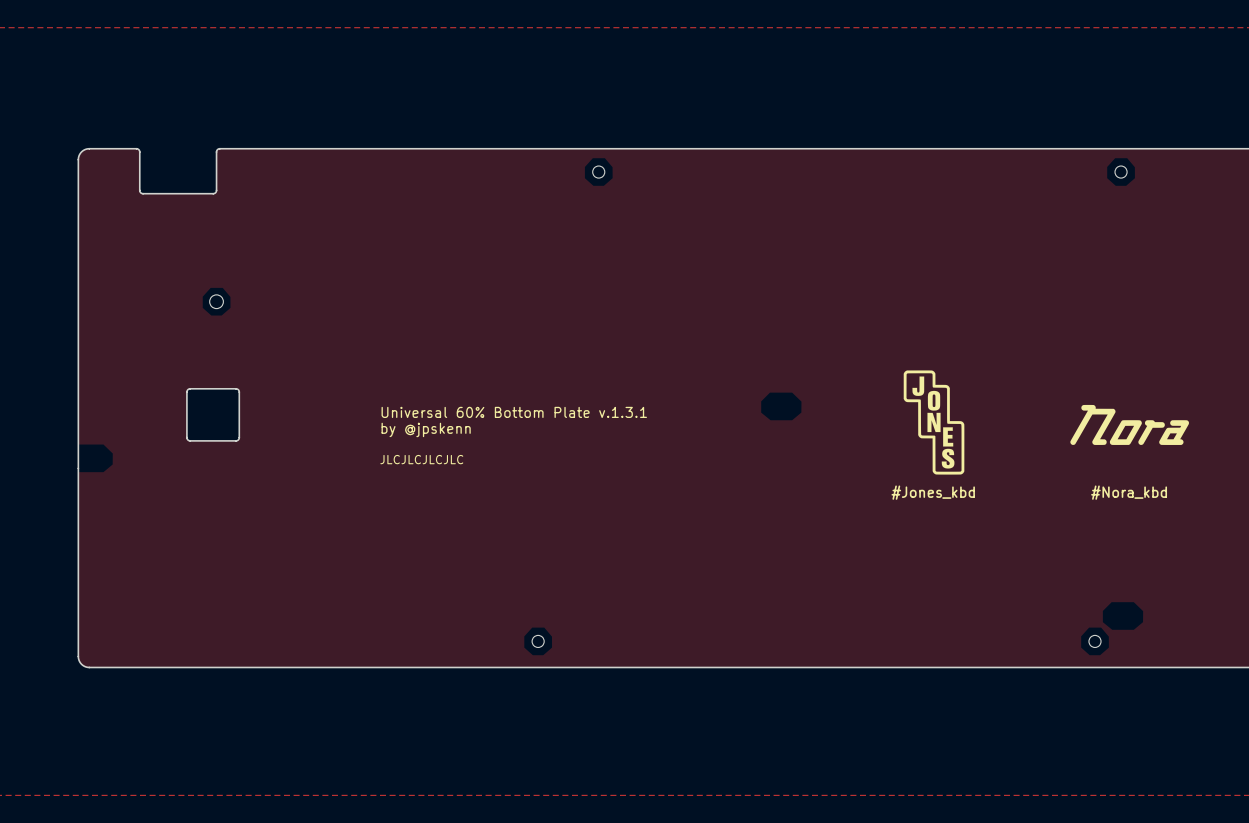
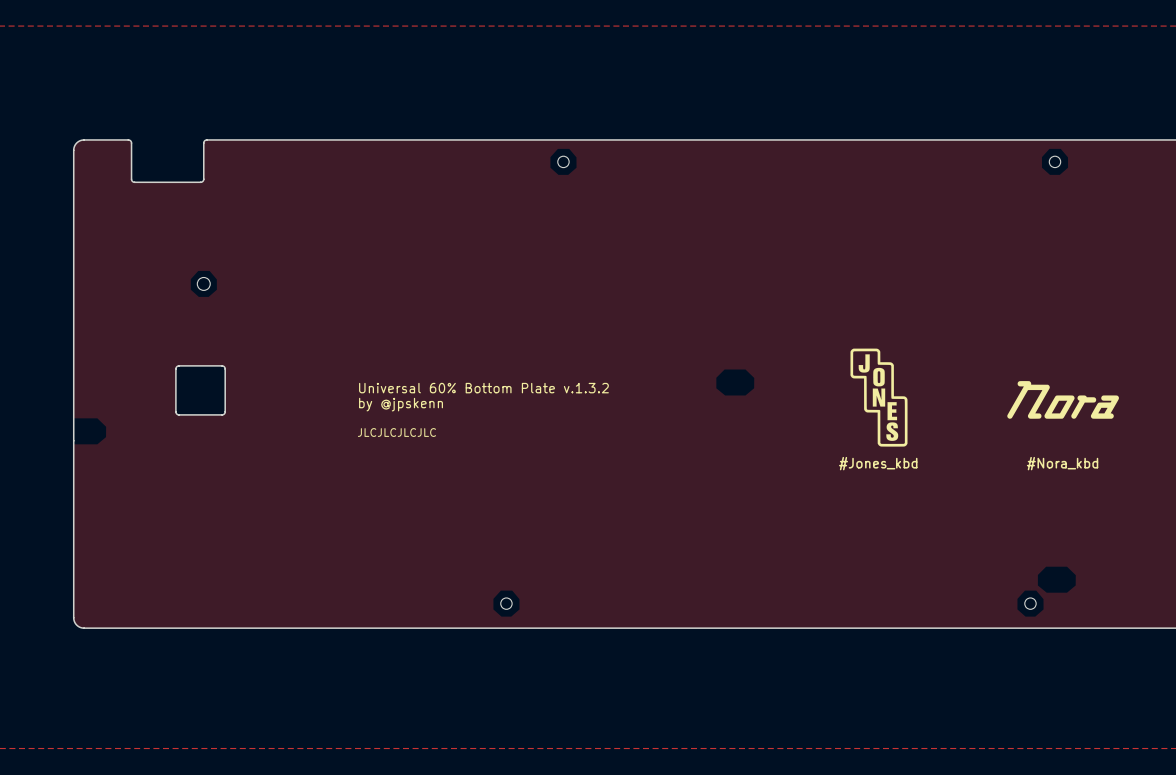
text: Universal 60% Bottom Plate v.1.3.1 (514, 412) -> Universal 60% Bottom Plate v.1.3.2 (483, 388)

